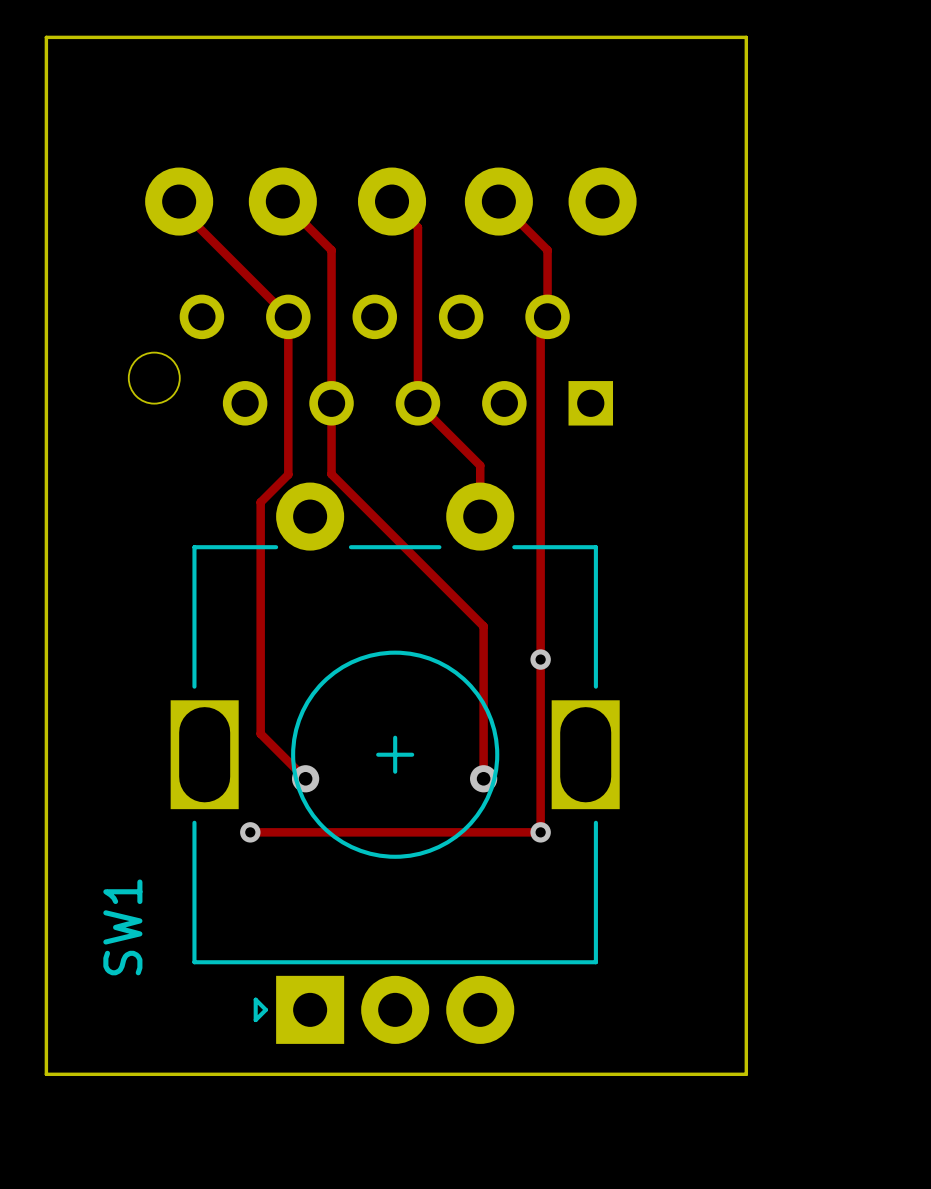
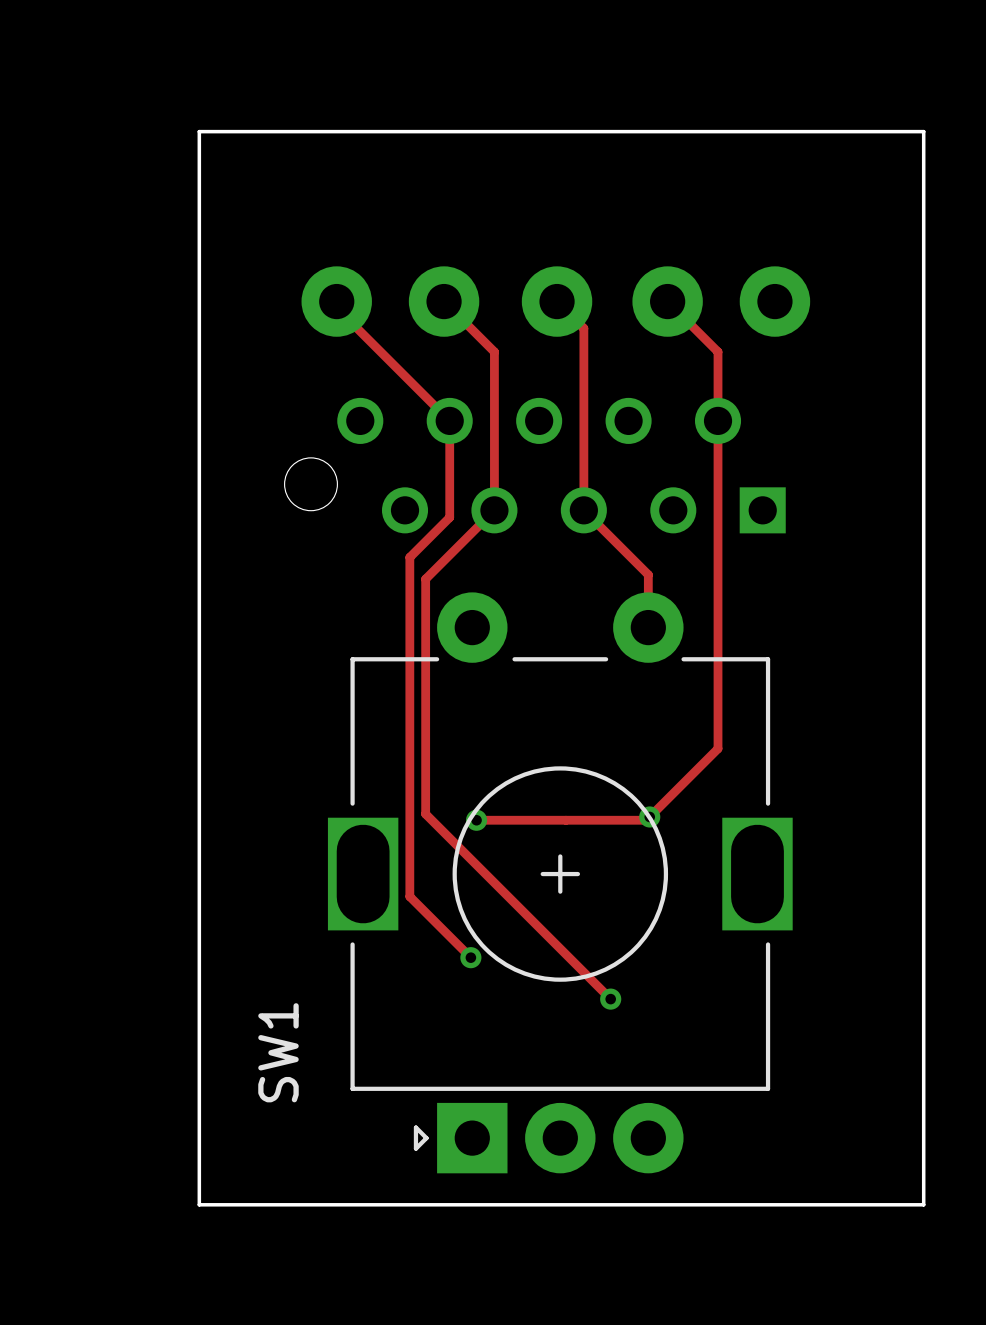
track: (547, 316) (540, 323) (540, 832) (250, 832) -> (718, 420) (718, 748) (646, 820) (476, 820)
track: (331, 403) (331, 474) (483, 626) (483, 778) -> (494, 510) (425, 579) (425, 814) (610, 999)
track: (288, 410) (288, 474) (260, 502) (260, 733) (305, 778) -> (449, 517) (409, 557) (409, 896) (470, 957)
via position: (540, 659) -> (649, 816)
via: none -> (476, 820)
via: (305, 778) -> none
via: (483, 778) -> none
via position: (250, 832) -> (470, 957)
via: (540, 832) -> none
via: none -> (610, 999)

